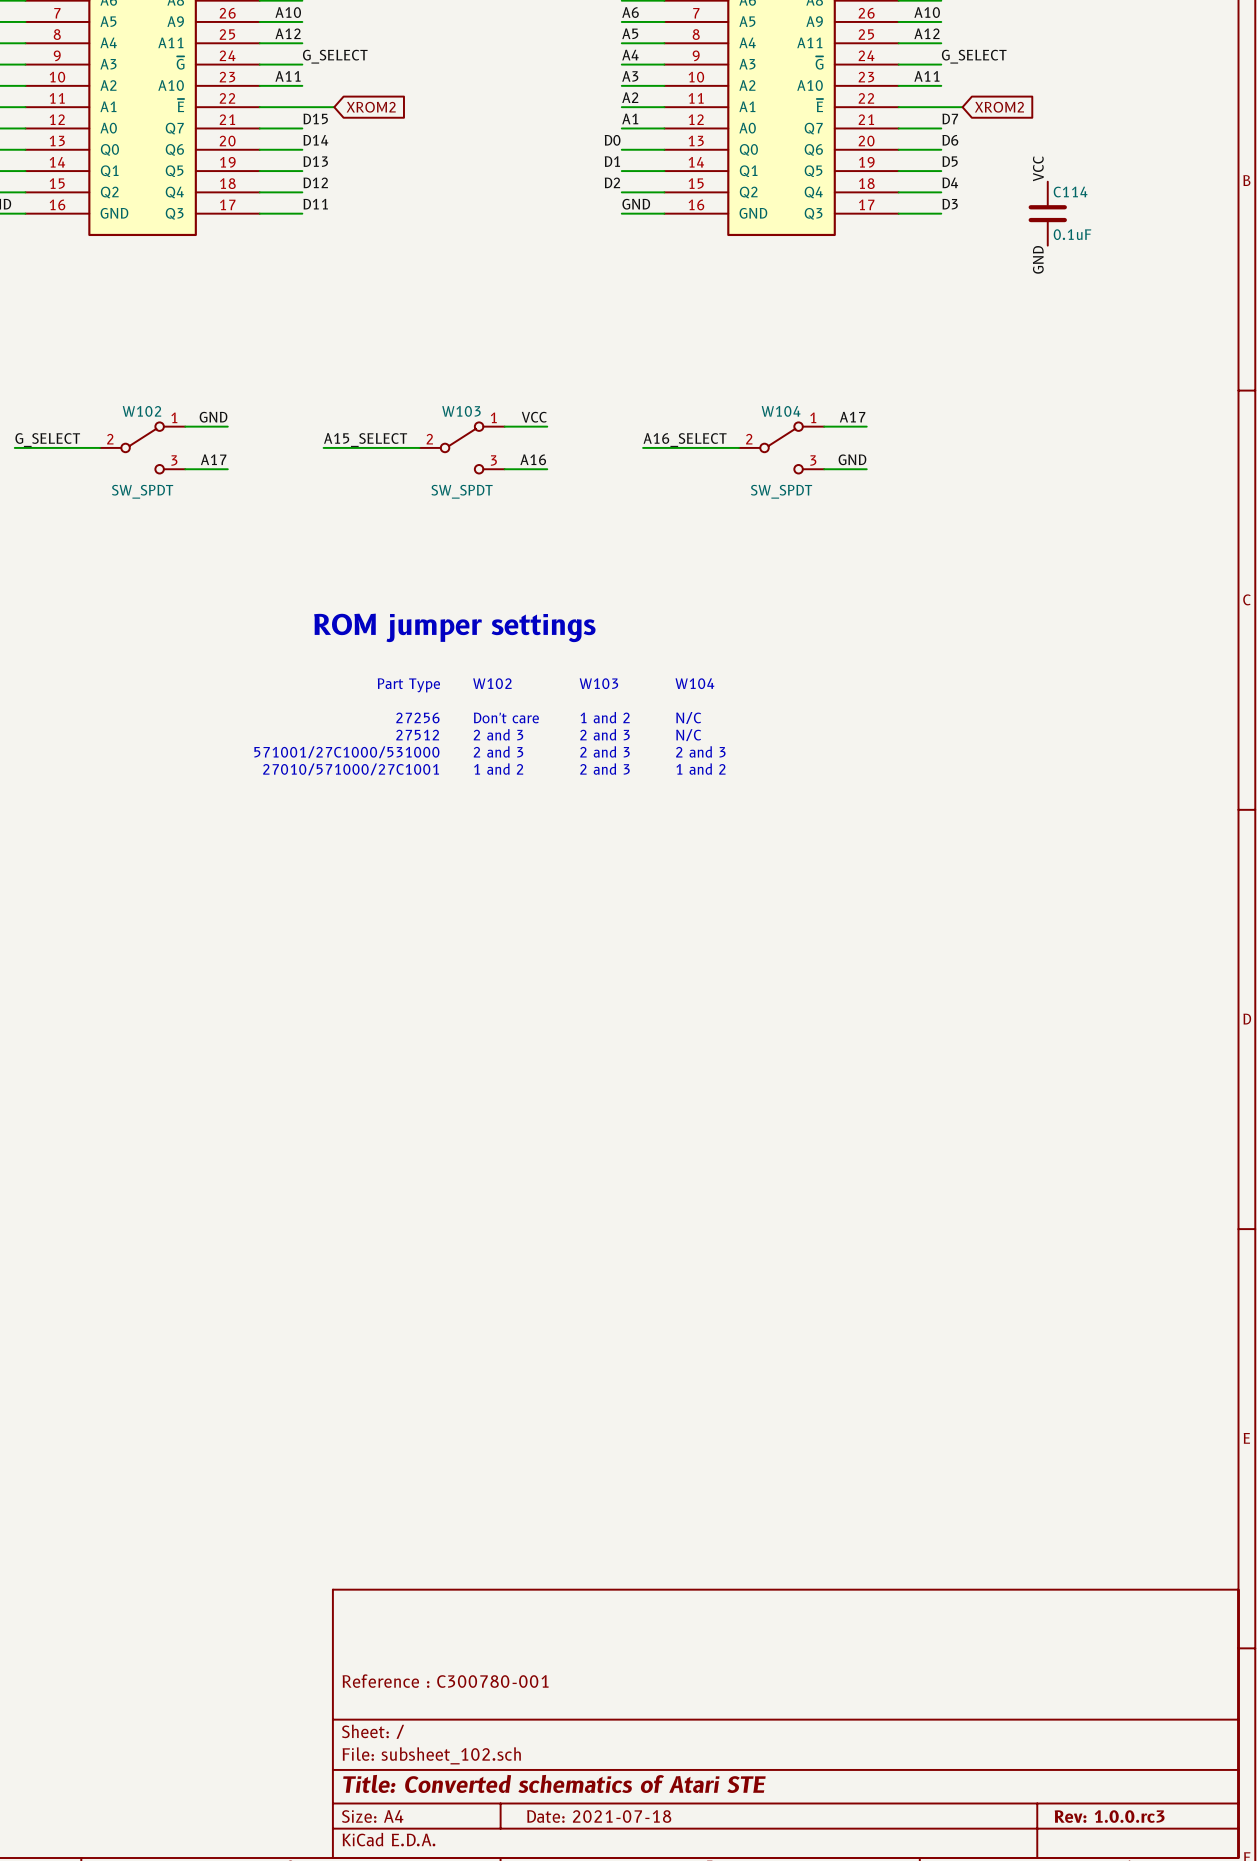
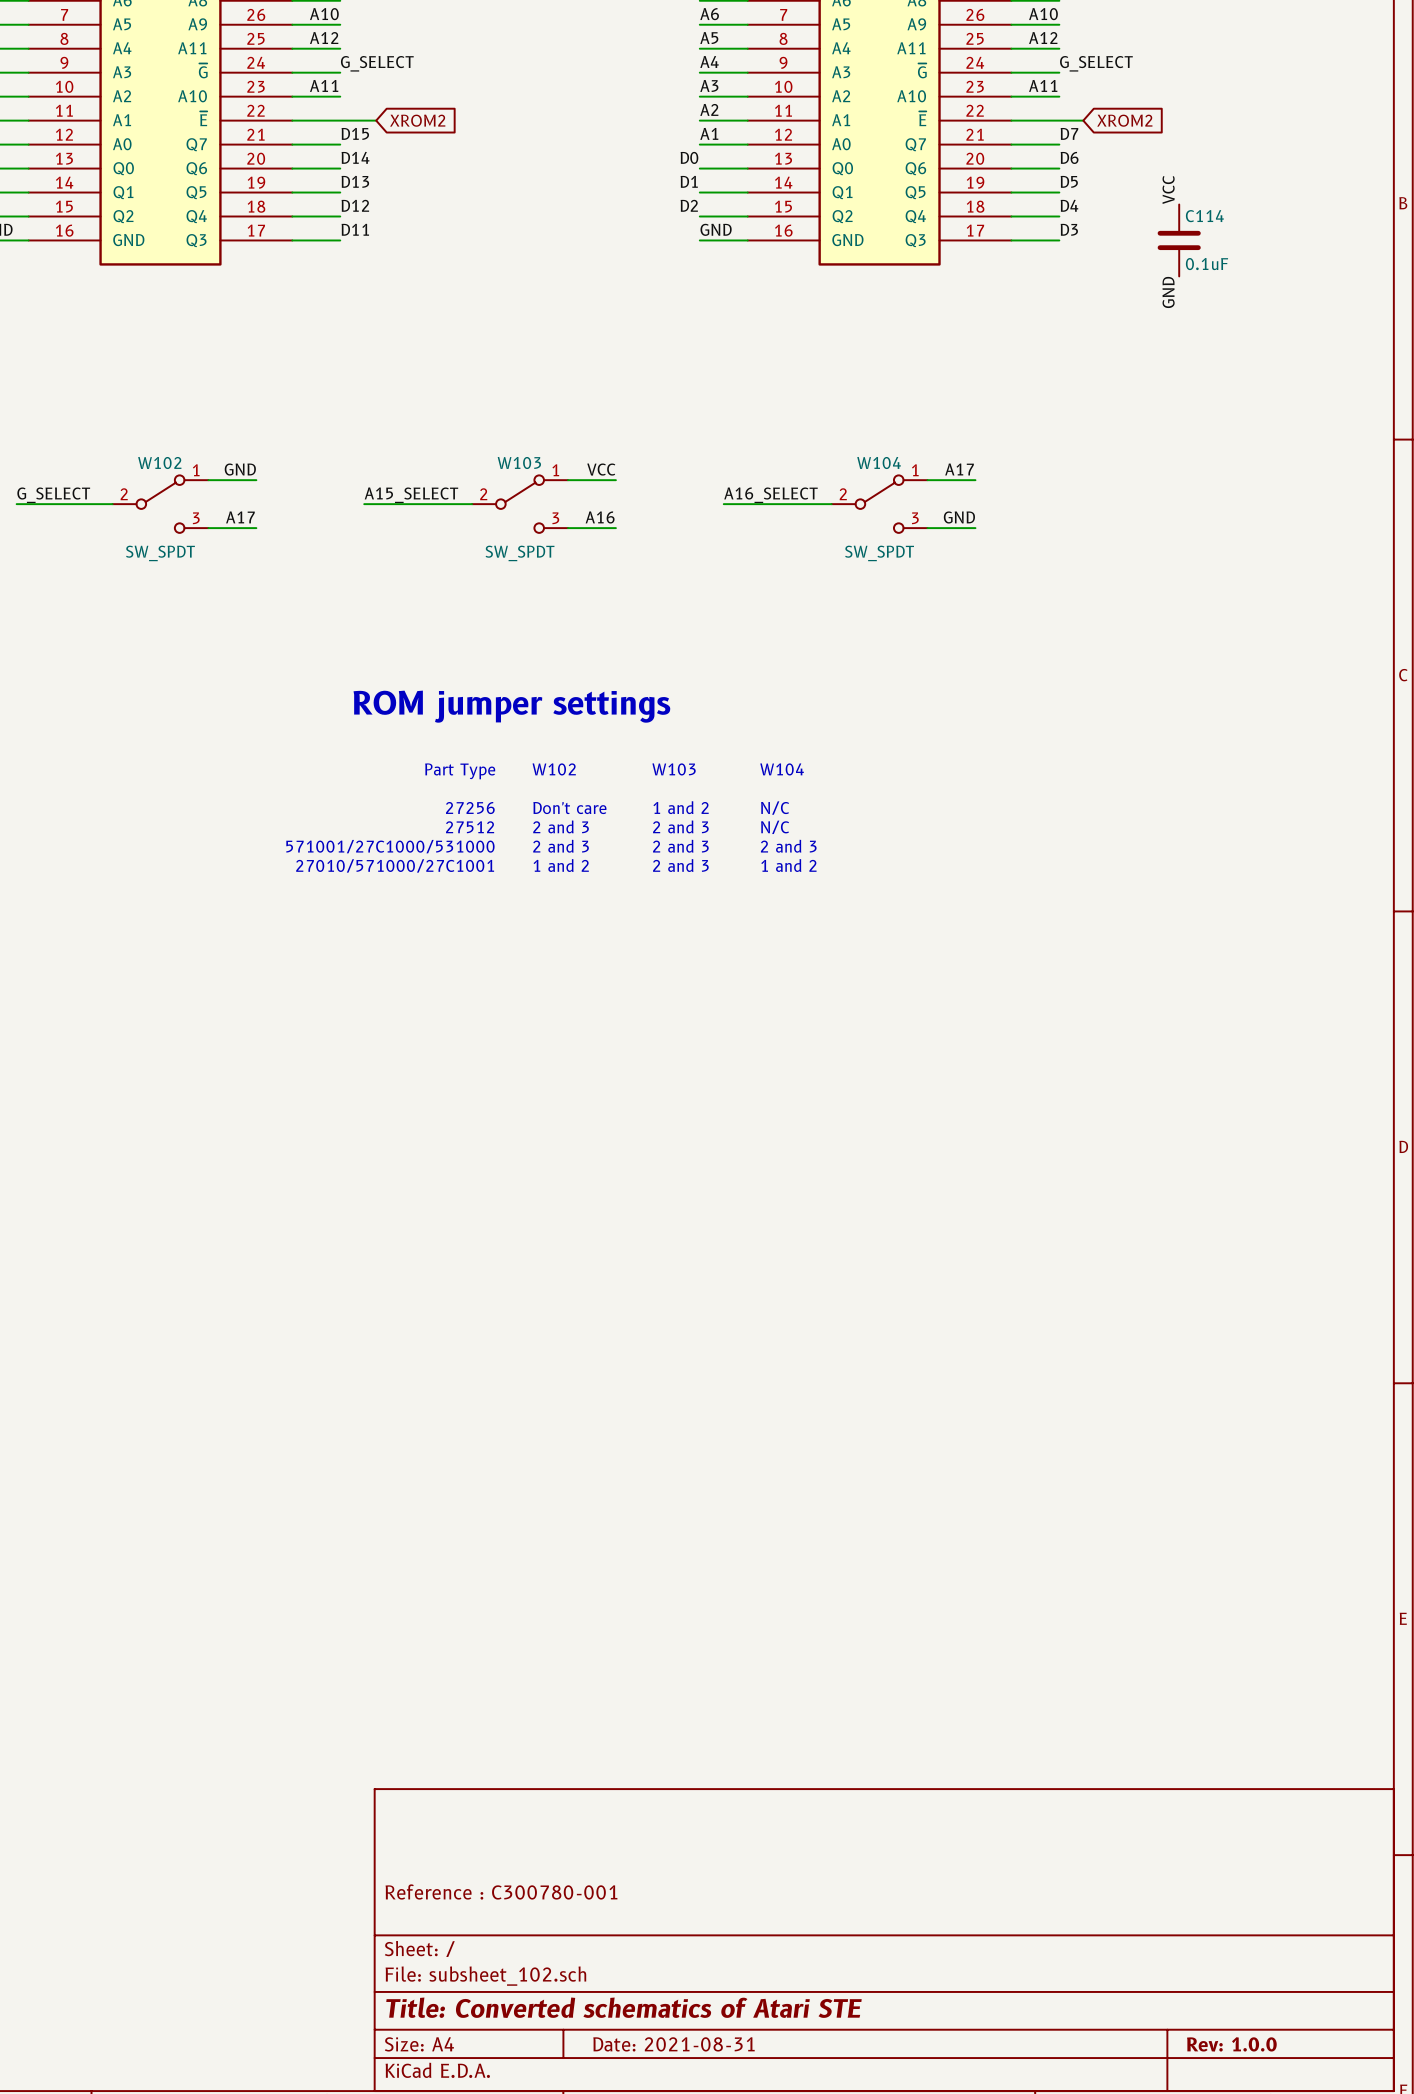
title block: Date: 2021-07-18 (599, 1816) -> Date: 2021-08-31 (674, 2044)
title block: Rev: 1.0.0.rc3 (1109, 1816) -> Rev: 1.0.0 (1231, 2044)

